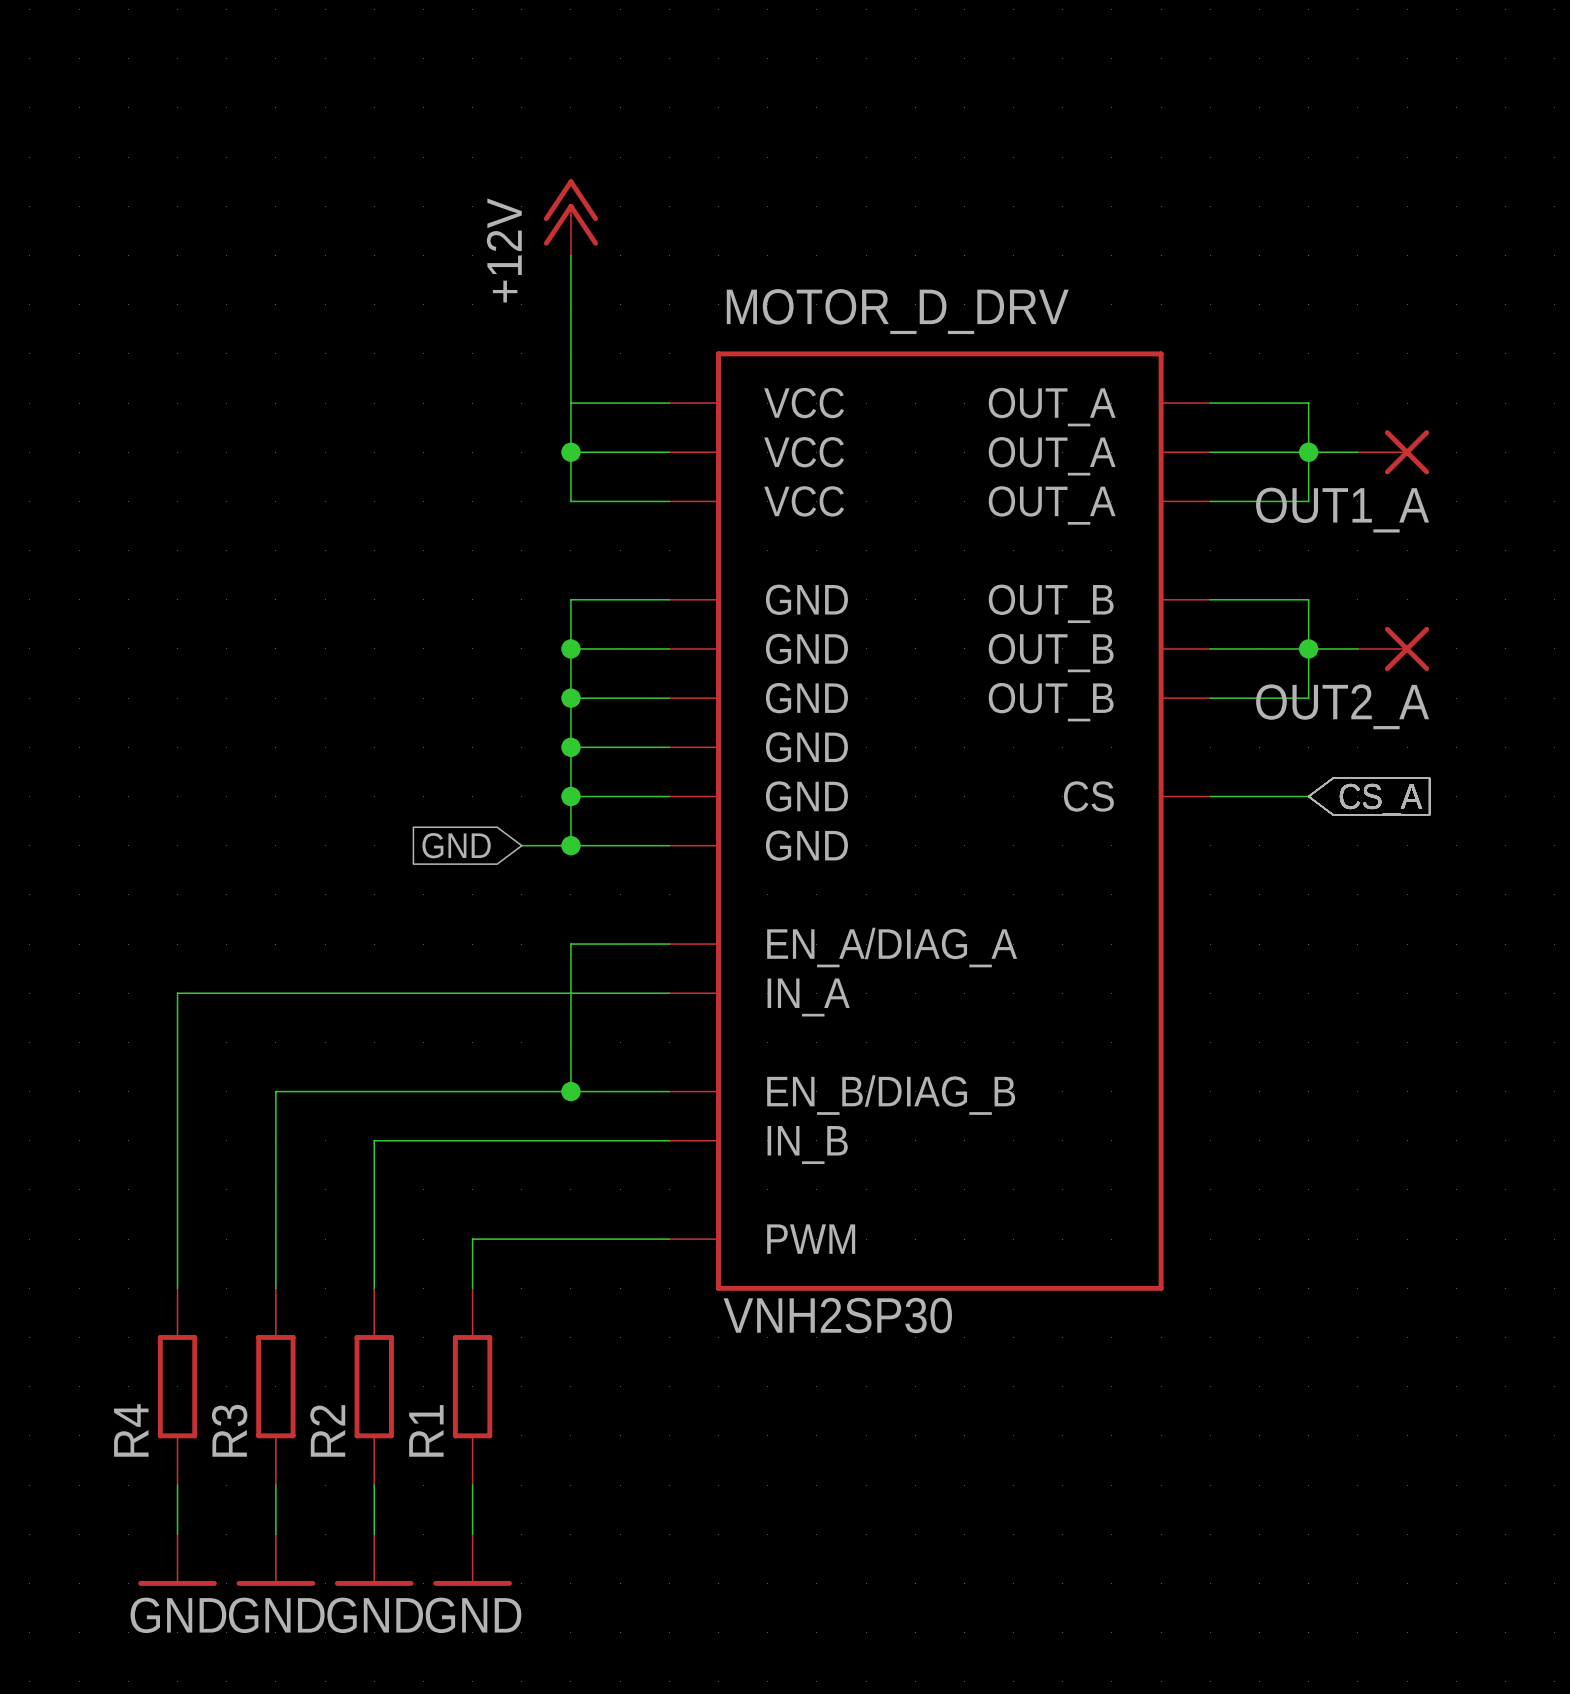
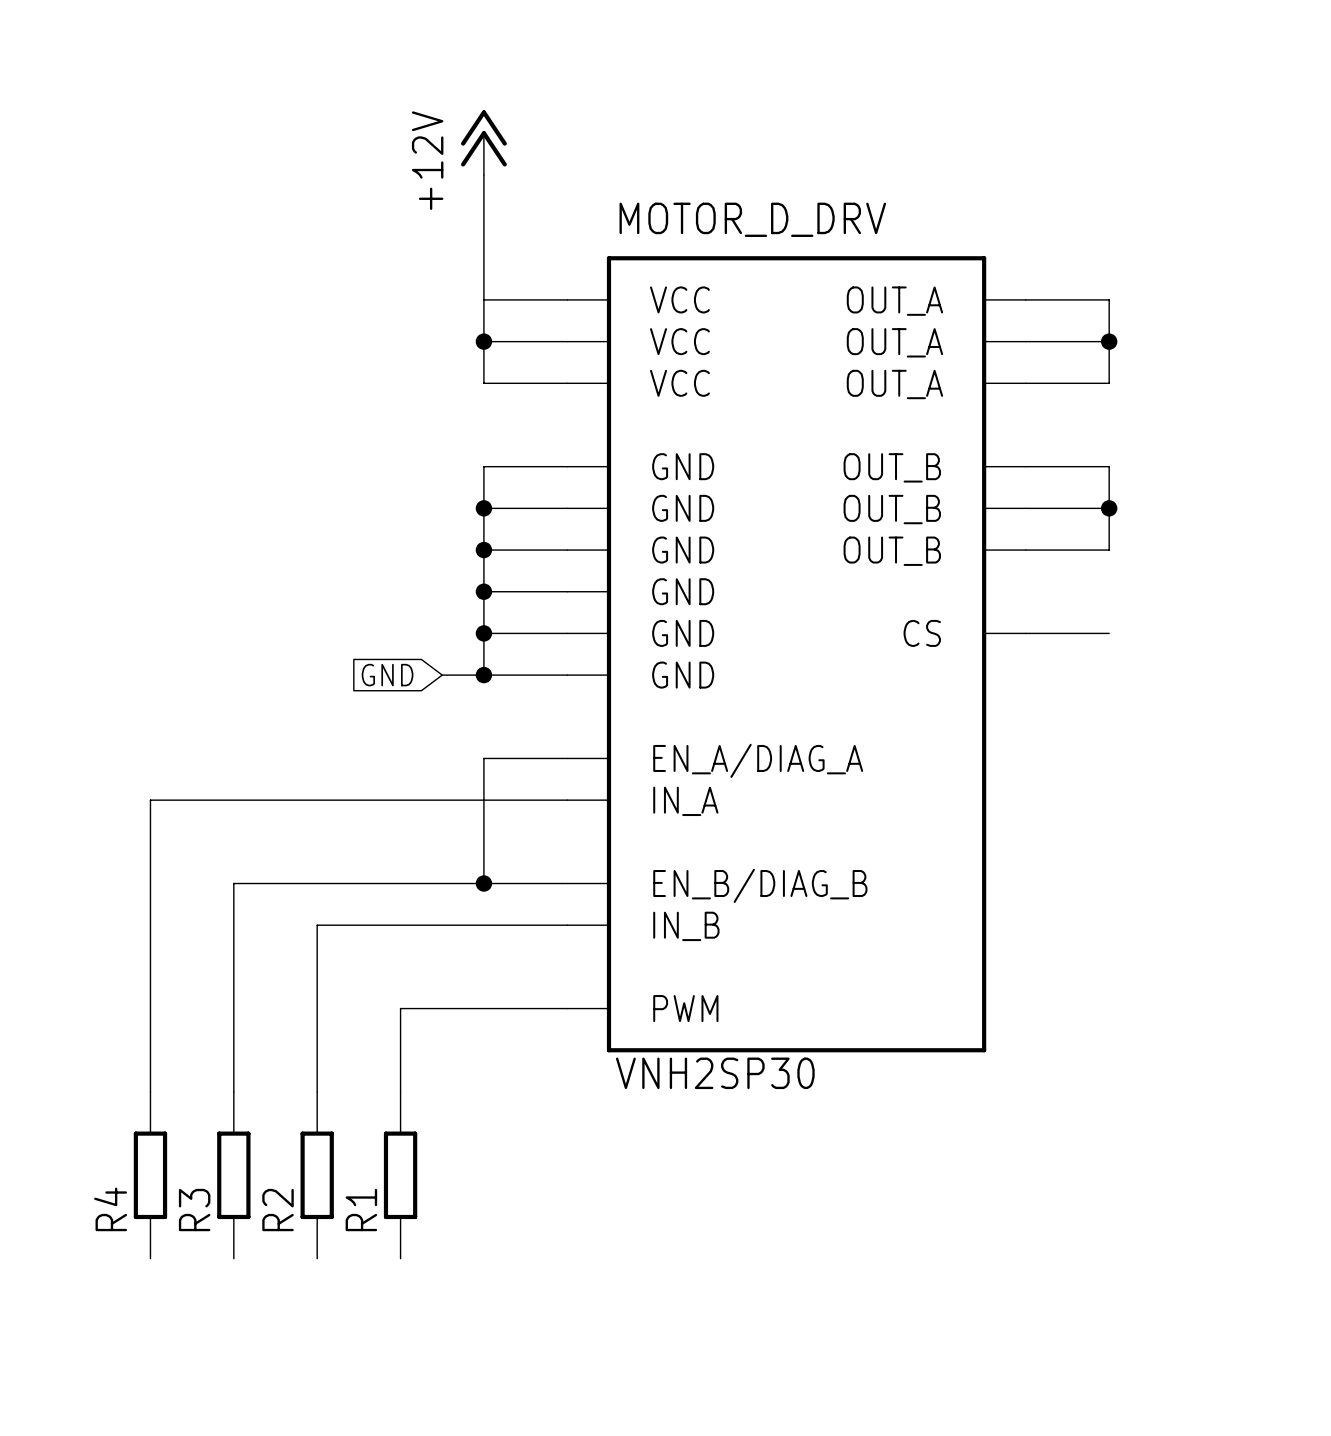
power symbol position: +12V (570, 217) -> +12V (483, 142)
wire: none -> (483, 299) (567, 299)
wire: none -> (1025, 299) (1109, 299) (1109, 341)
wire: (570, 452) (570, 501) (669, 501) -> none
junction position: (570, 452) -> (483, 341)
junction position: (1308, 452) -> (1109, 341)
wire: (1357, 452) (1308, 452) (1308, 501) (1210, 501) -> none
OUT1_A: (1393, 452) -> none
wire: none -> (567, 466) (483, 466) (483, 508)
wire: none -> (1025, 466) (1109, 466) (1109, 508)
junction: none -> (483, 508)
junction position: (1308, 648) -> (1109, 508)
wire: (1357, 648) (1308, 648) (1308, 698) (1210, 698) -> none
OUT2_A: (1393, 648) -> none
wire: (570, 796) (570, 845) -> (483, 675) (442, 675)
wire: (1210, 796) (1308, 796) -> (1025, 633) (1109, 633)
global label: CS_A (1380, 799) -> none
MOTOR_D_DRV position: (939, 821) -> (796, 654)
global label position: GND (456, 845) -> GND (387, 675)
wire: (521, 845) (669, 845) -> none
junction: (570, 845) -> none
wire: (177, 993) (669, 993) -> (150, 841) (150, 800) (483, 800) (483, 758) (567, 758)
wire: (570, 1042) (570, 1091) -> none
wire: none -> (567, 883) (233, 883) (233, 925)
wire: (275, 1091) (374, 1091) -> (317, 966) (317, 925)
junction position: (570, 1091) -> (483, 883)
wire: (374, 1140) (669, 1140) -> none
wire: (472, 1239) (669, 1239) -> (400, 1050) (400, 1008) (567, 1008)
wire: (177, 1485) (177, 1534) -> none
wire: (275, 1485) (275, 1534) -> none
wire: (374, 1485) (374, 1534) -> none
wire: (472, 1485) (472, 1534) -> none
power symbol: GND (177, 1560) -> none
power symbol: GND (275, 1560) -> none
power symbol: GND (374, 1560) -> none
power symbol: GND (472, 1560) -> none

